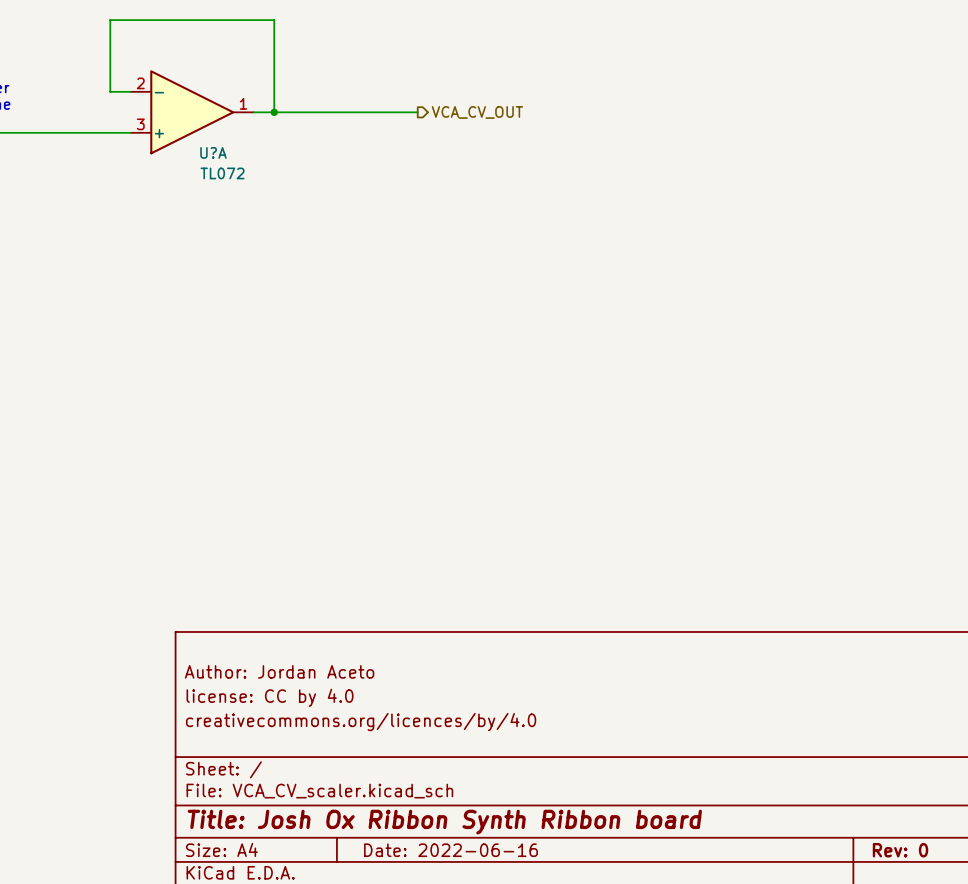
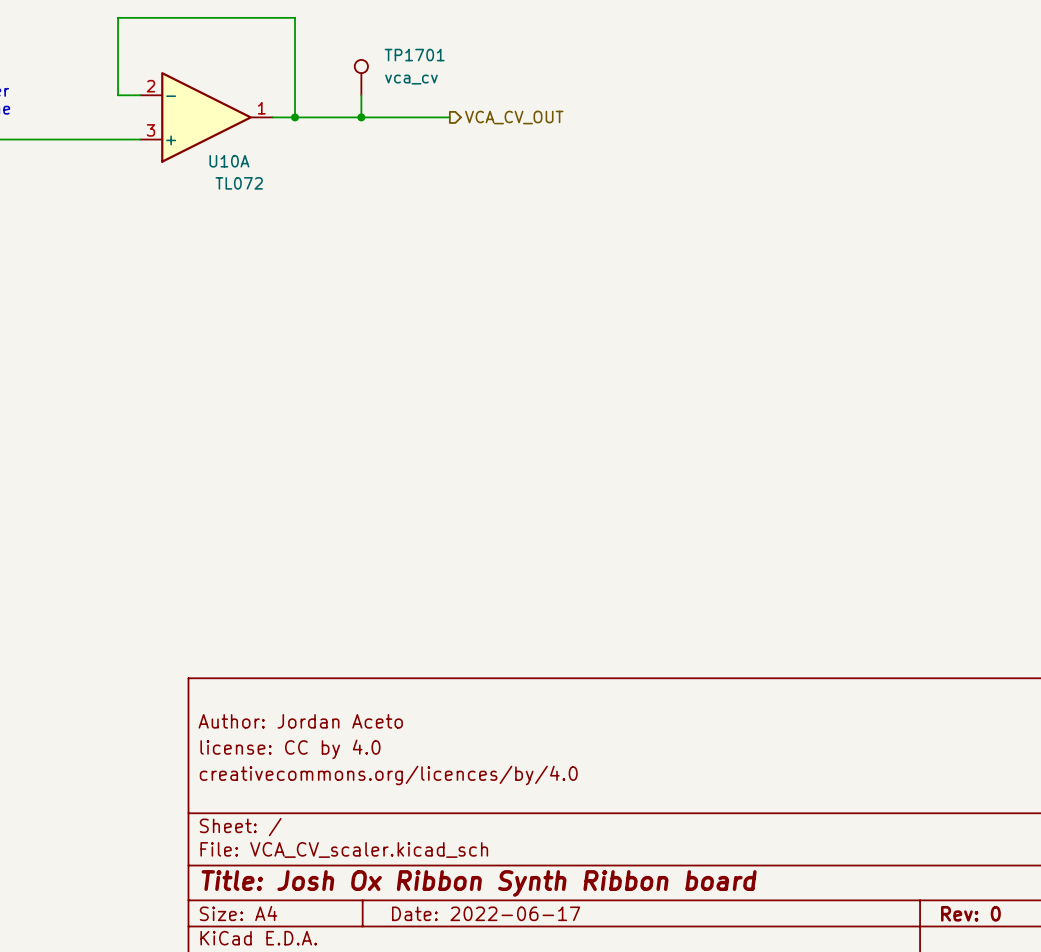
TP1701: none -> vca_cv (361, 77)
wire: none -> (361, 95) (361, 117)
junction: none -> (361, 117)
U?A name: U?A (213, 152) -> U10A (229, 161)
title block: Date: 2022-06-16 (451, 850) -> Date: 2022-06-17 (486, 913)

